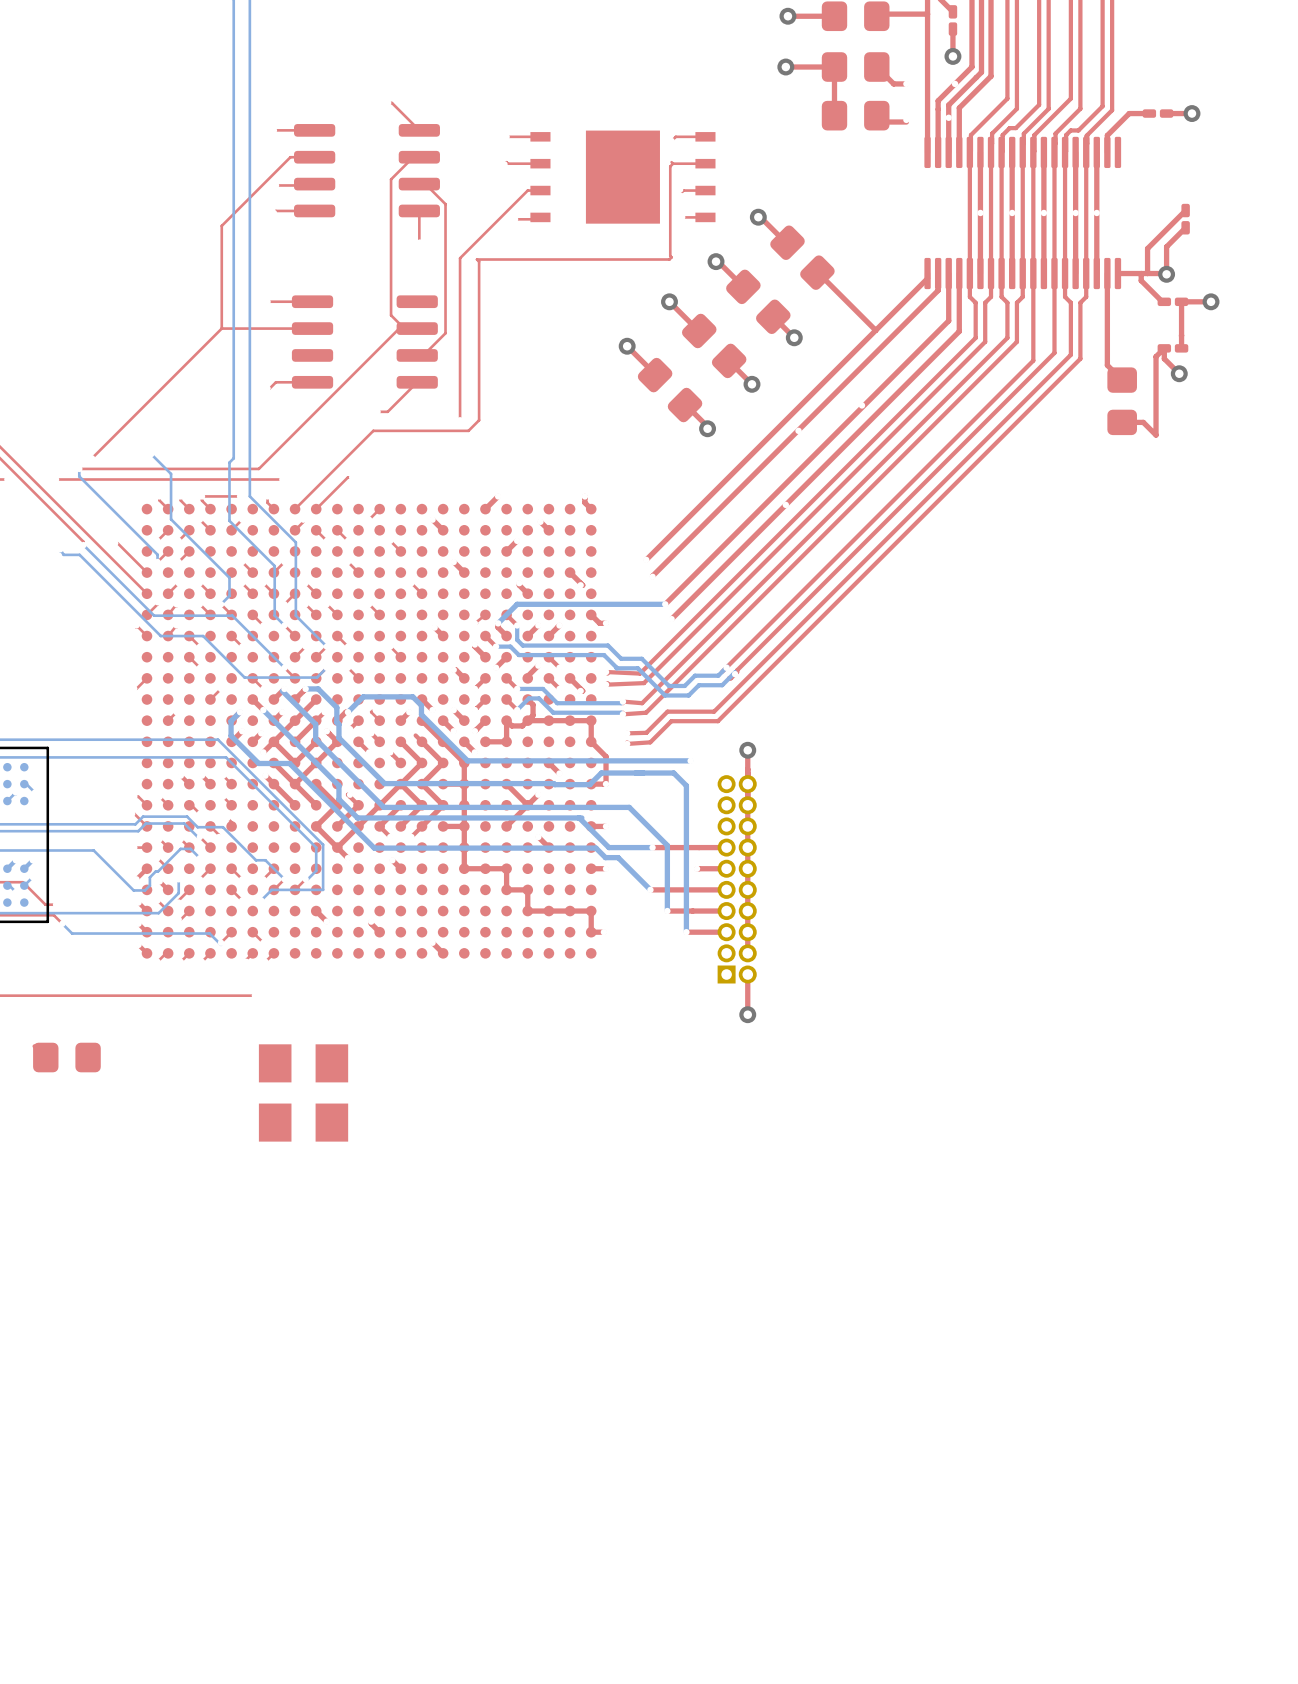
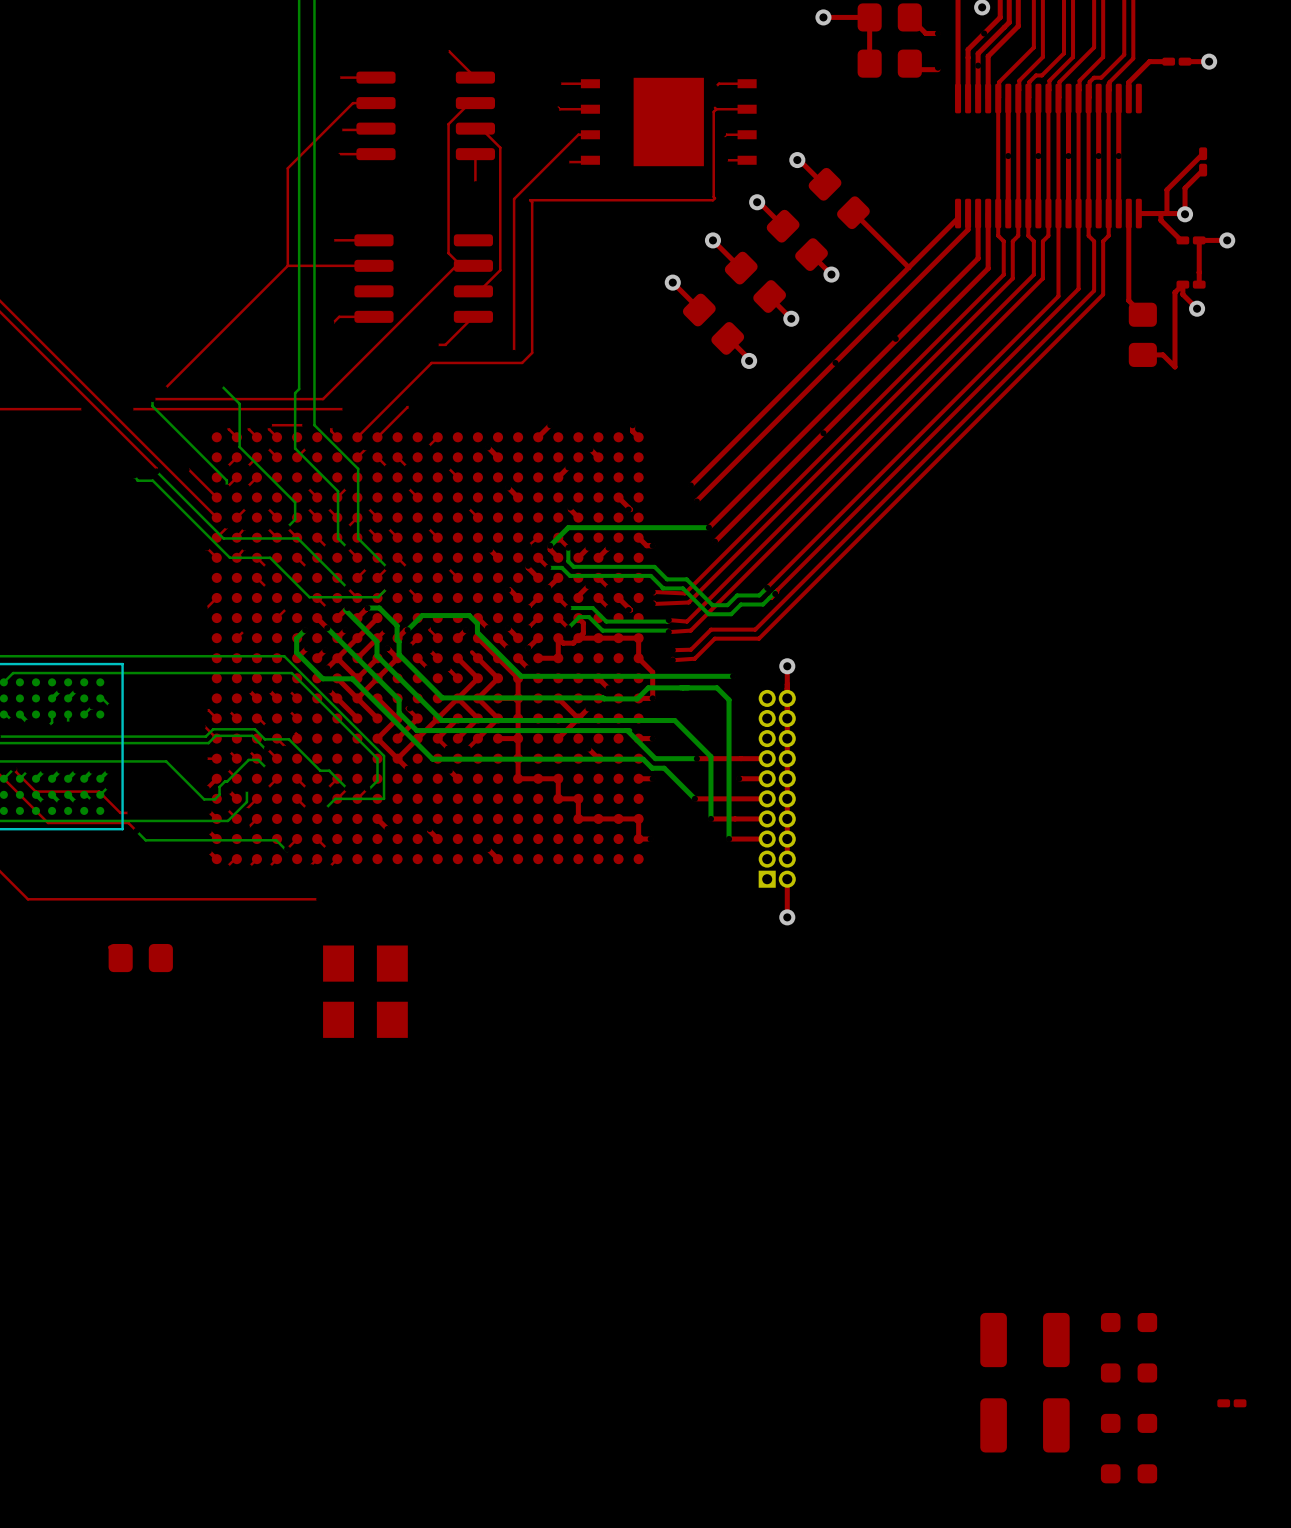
part: none -> (1129, 1322)
part: none -> (1024, 1340)
part: none -> (1129, 1372)
part: none -> (1231, 1403)
part: none -> (1129, 1423)
part: none -> (1024, 1425)
part: none -> (1129, 1473)

